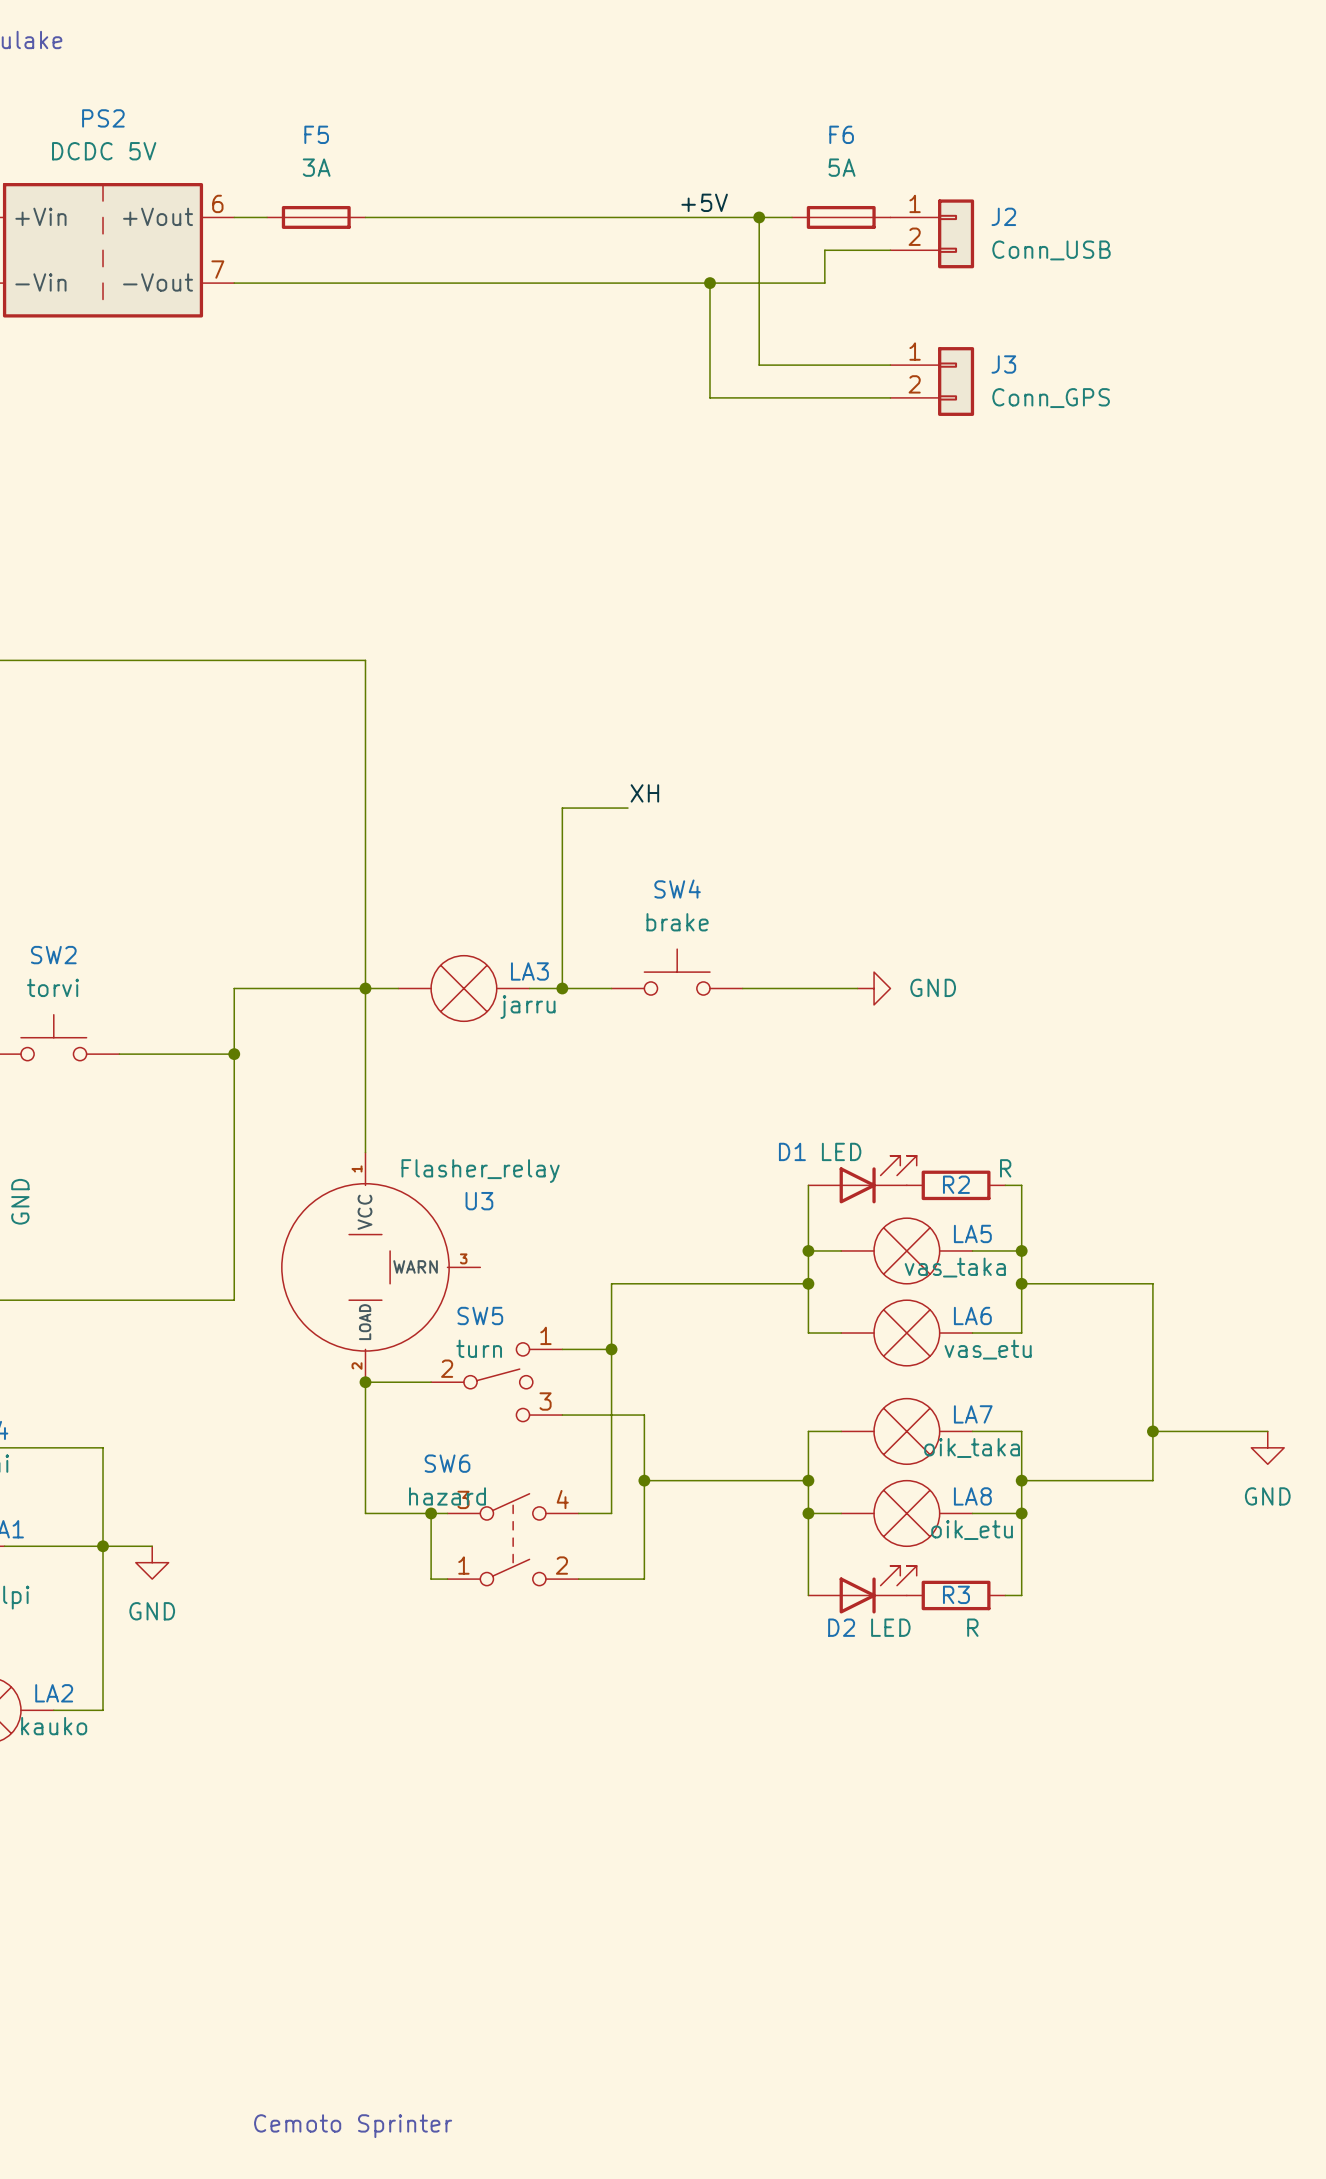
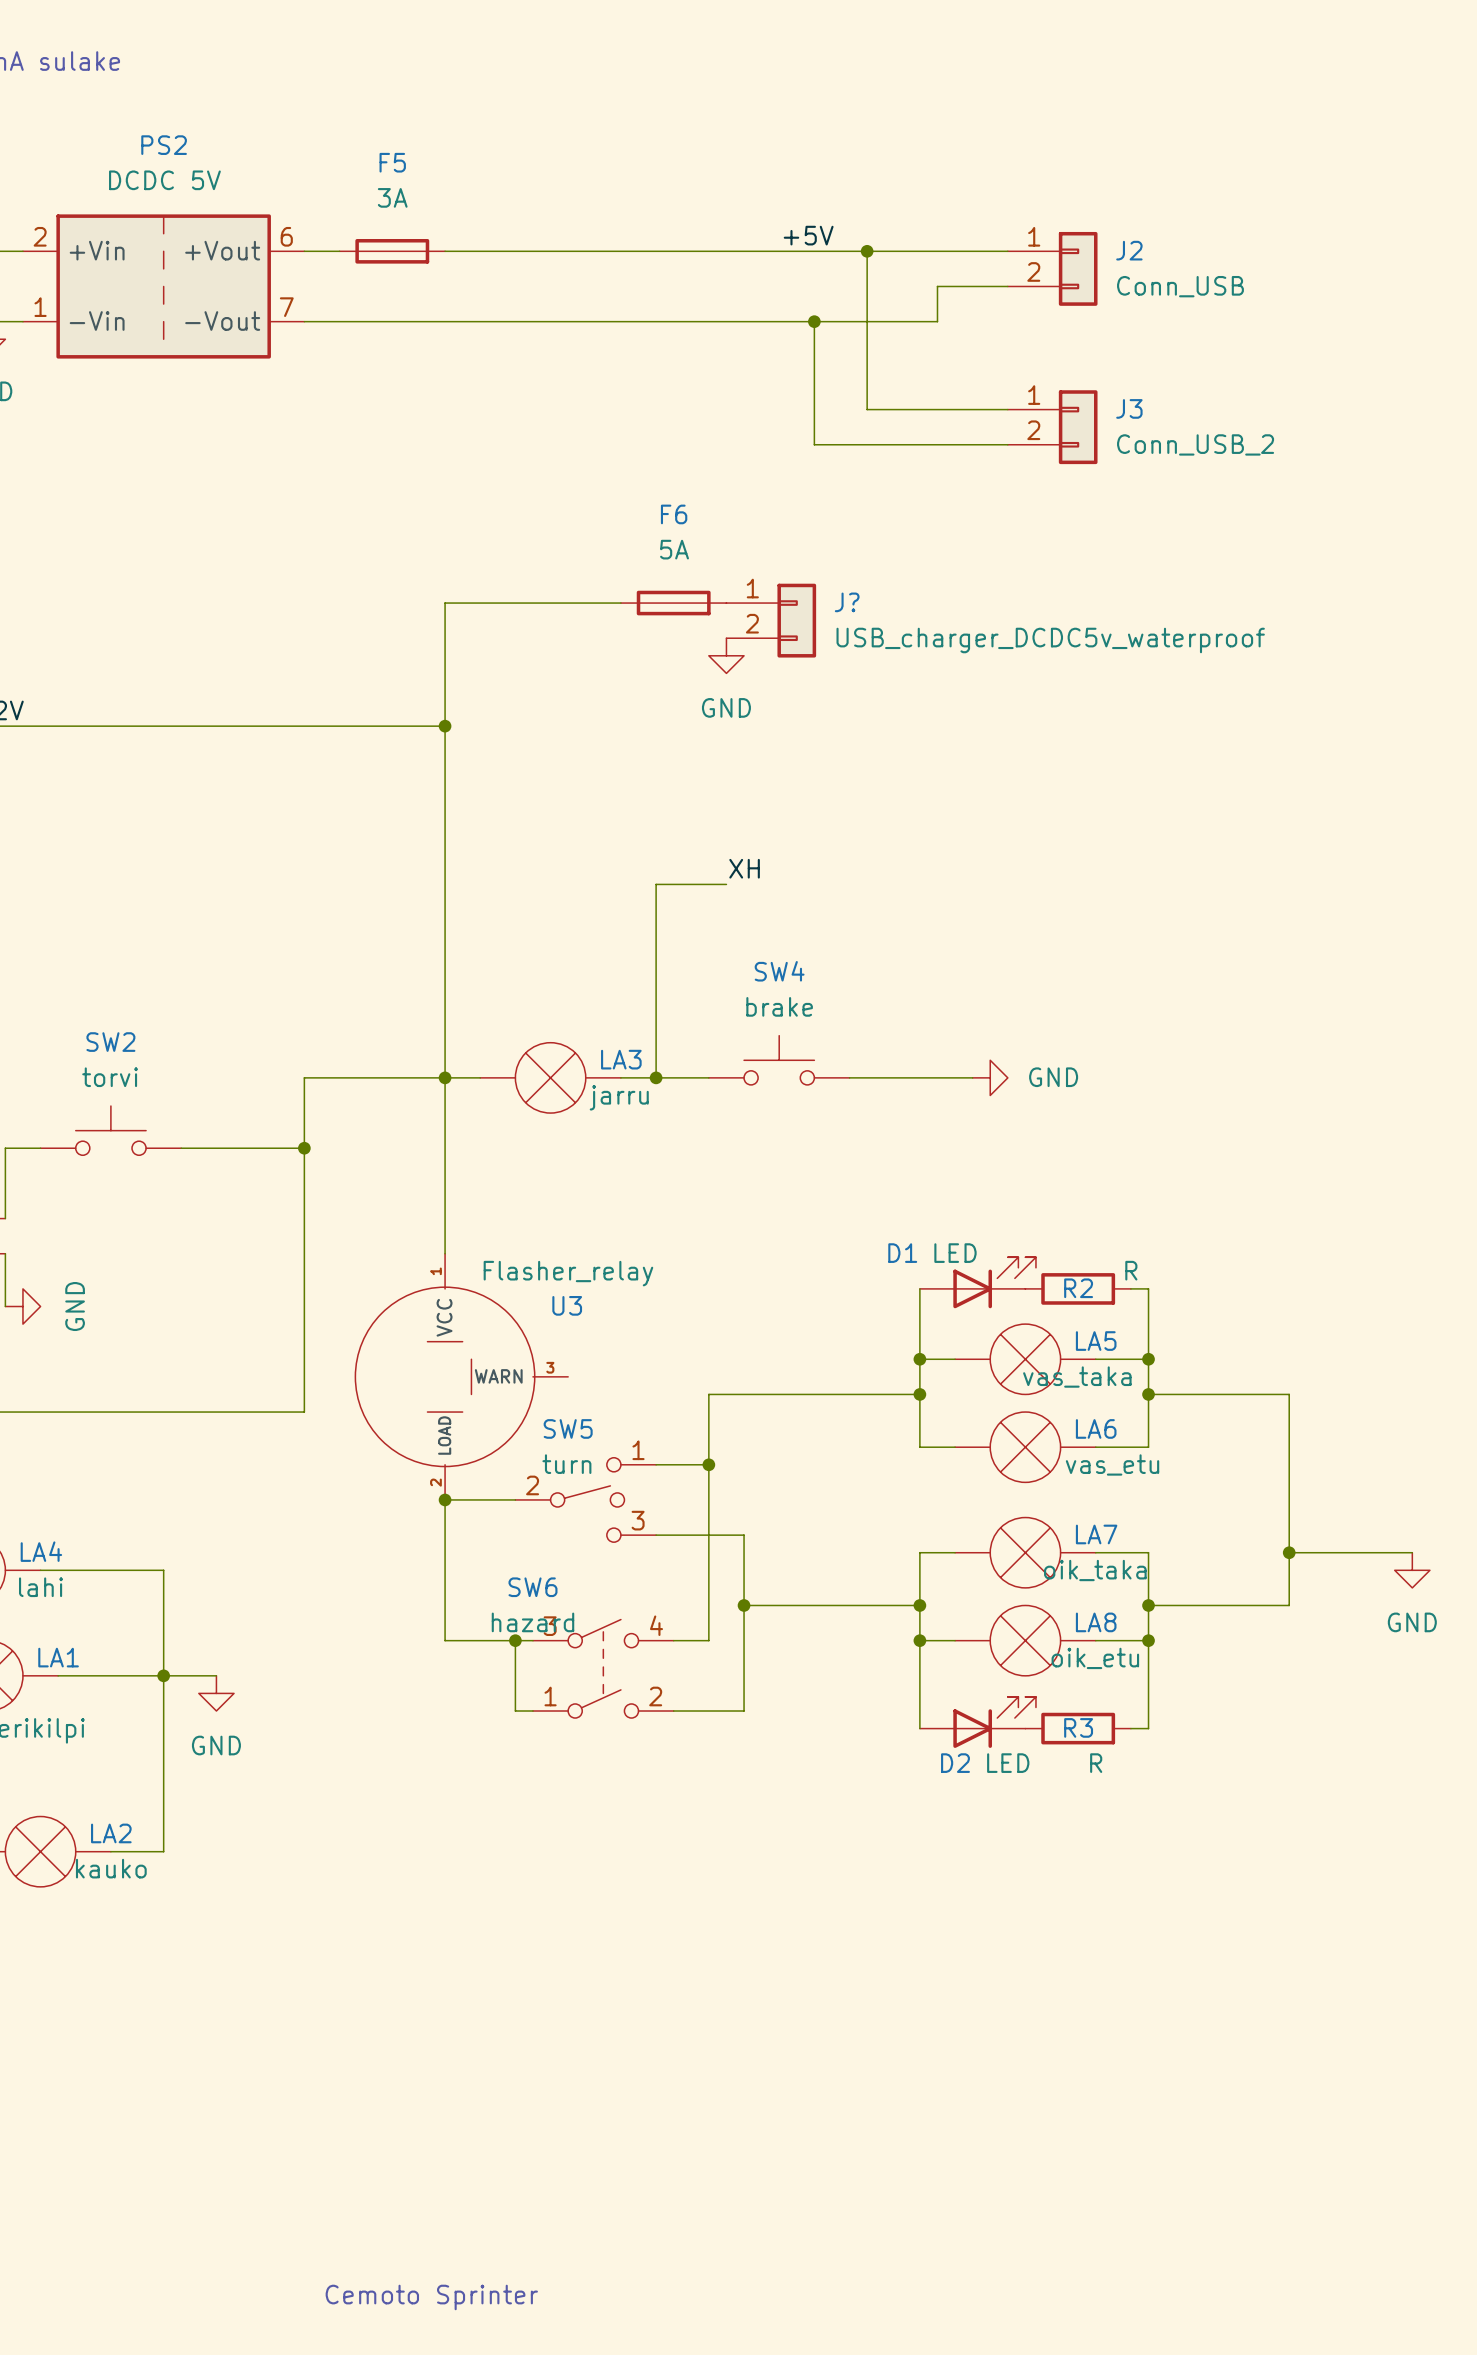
F6 position: (841, 217) -> (673, 603)
J3 value: Conn_GPS (1051, 398) -> Conn_USB_2 (1195, 444)
wire: none -> (620, 603) (445, 603) (445, 726)
J?: none -> USB_charger_DCDC5v_waterproof (771, 620)
power symbol: none -> GND (726, 655)
junction: none -> (445, 726)

